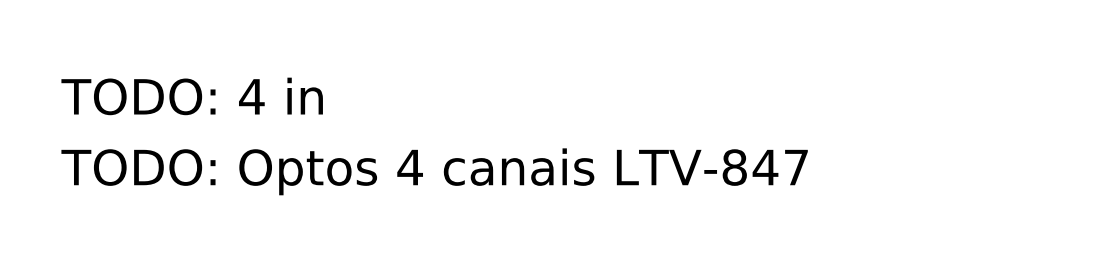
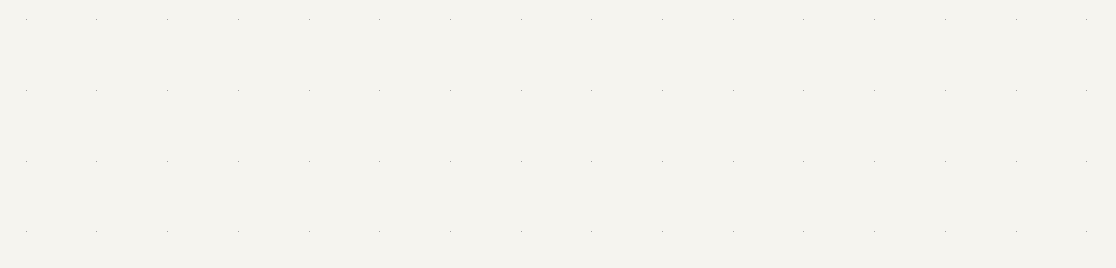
text: TODO: 4 in (192, 96) -> none
text: TODO: Optos 4 canais LTV-847 (434, 171) -> none

